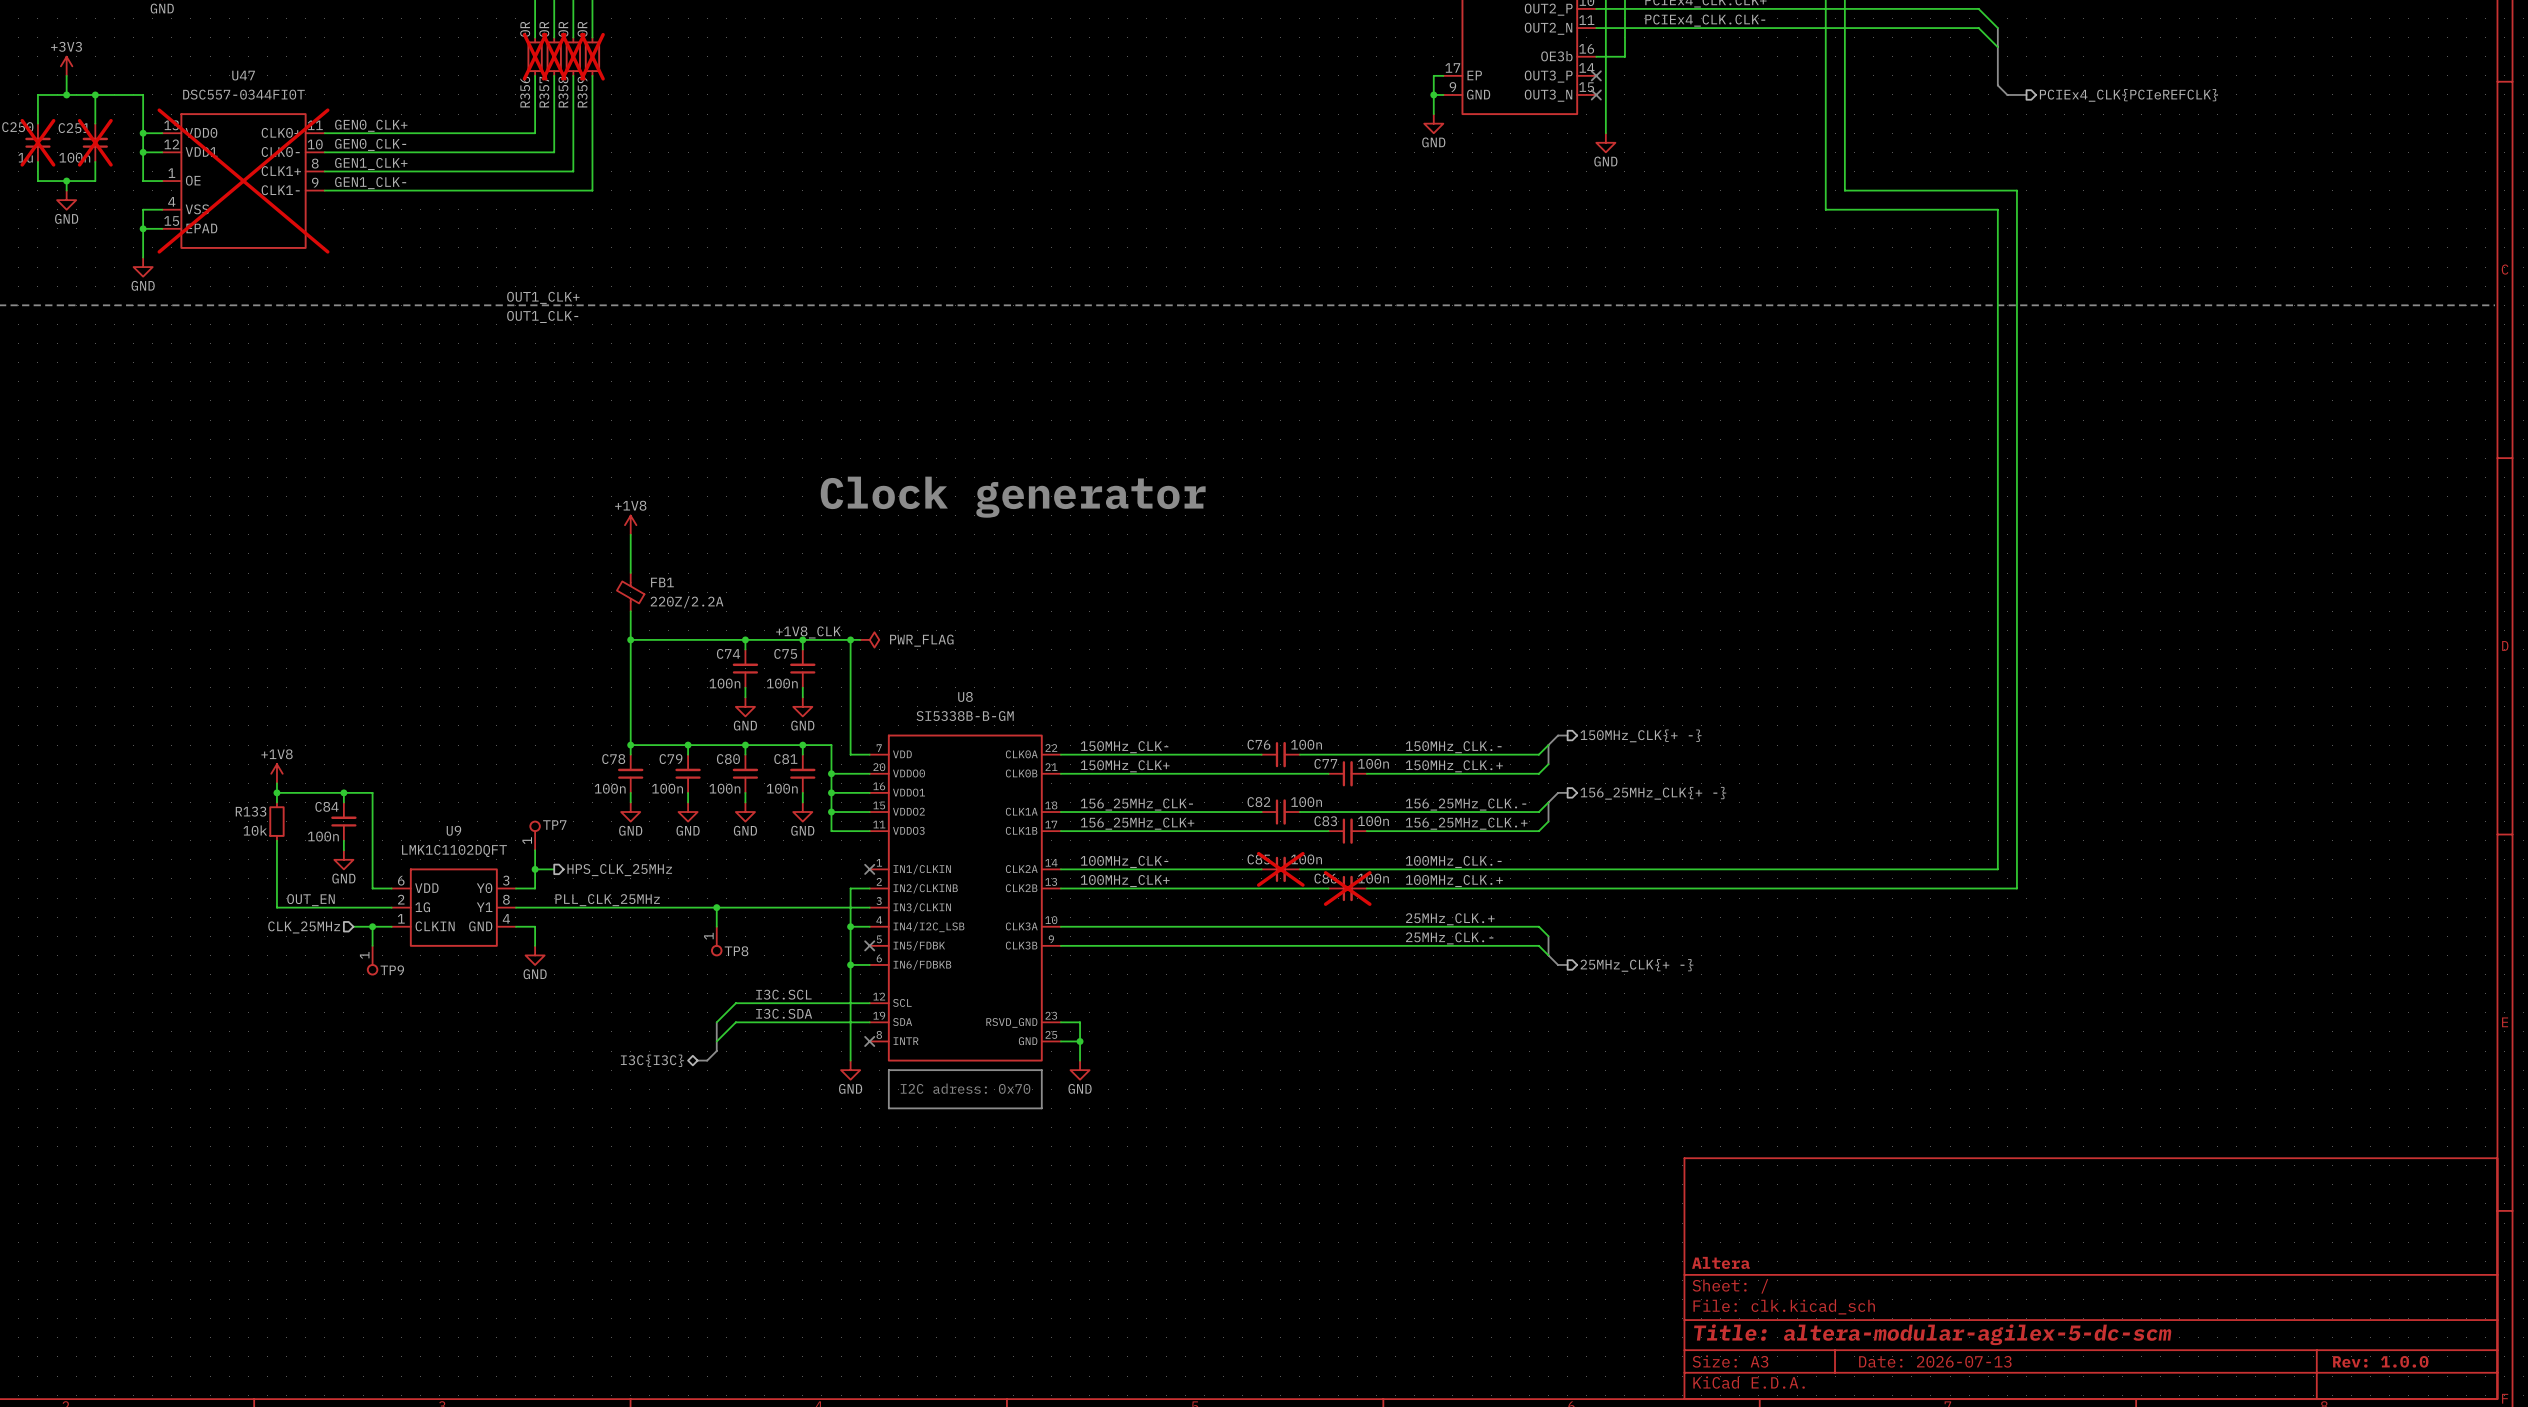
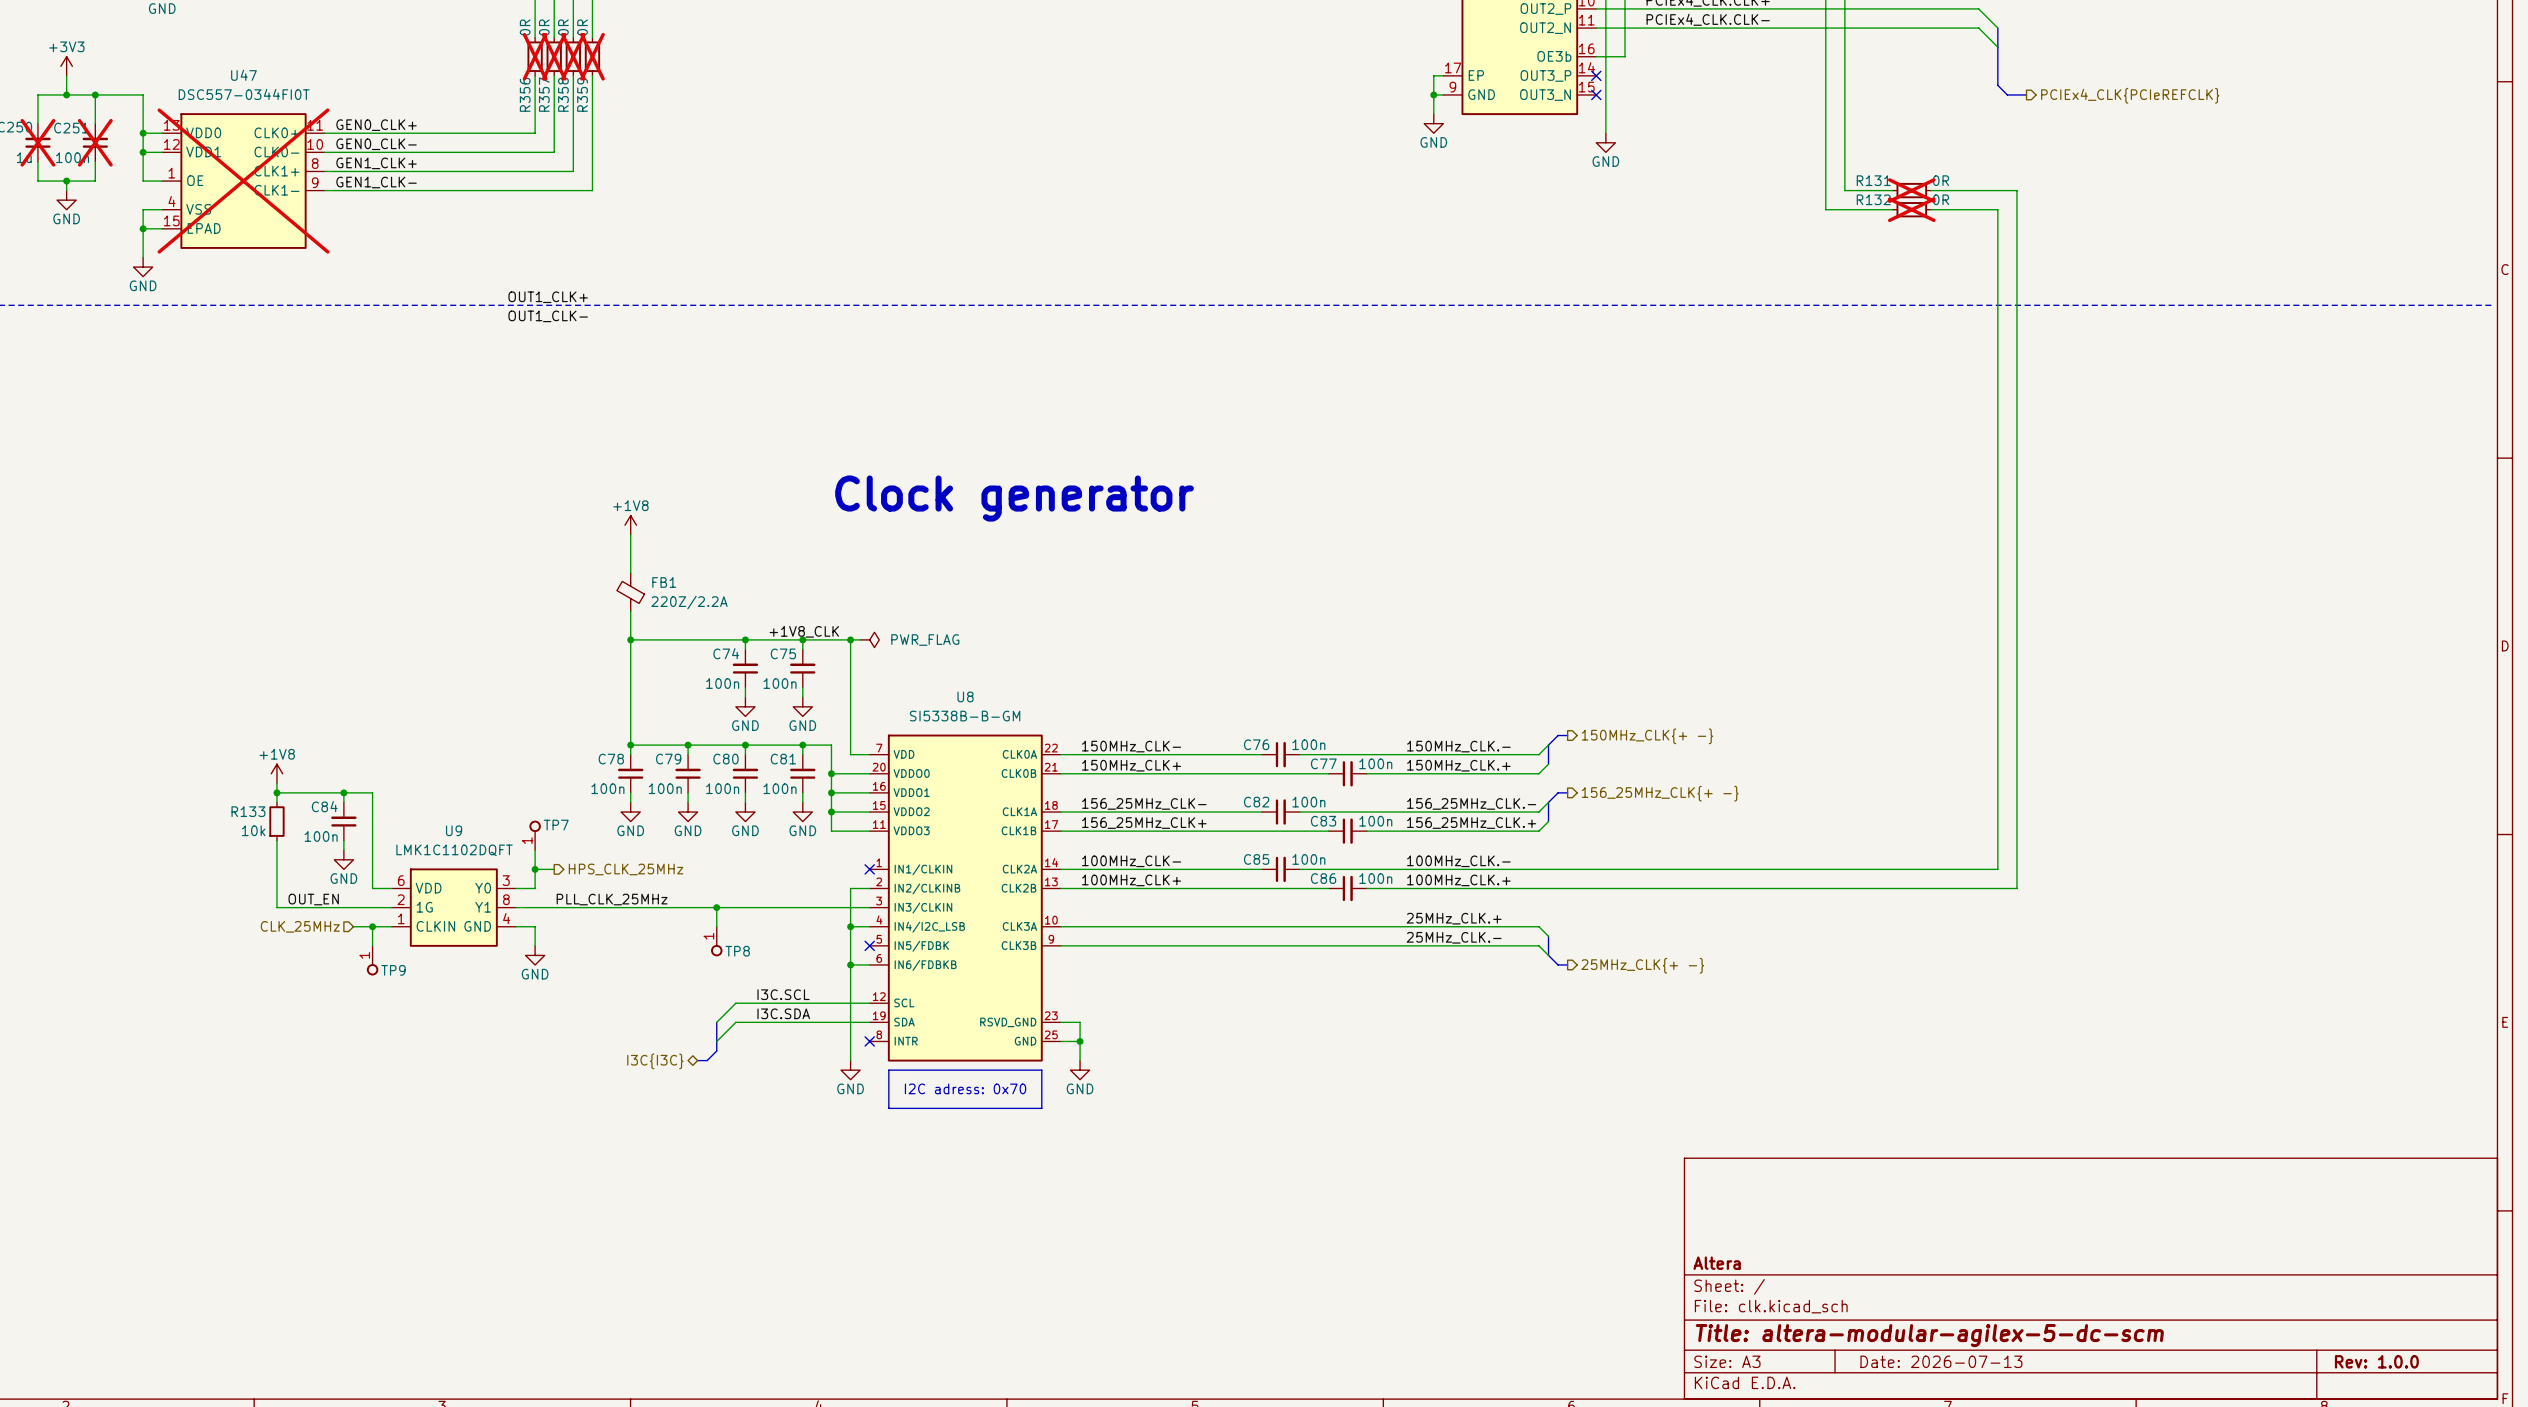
R131: none -> (1911, 190)
R132: none -> (1911, 209)
C85 do-not-place cross: (1280, 869) -> none
C86 do-not-place cross: (1347, 888) -> none

